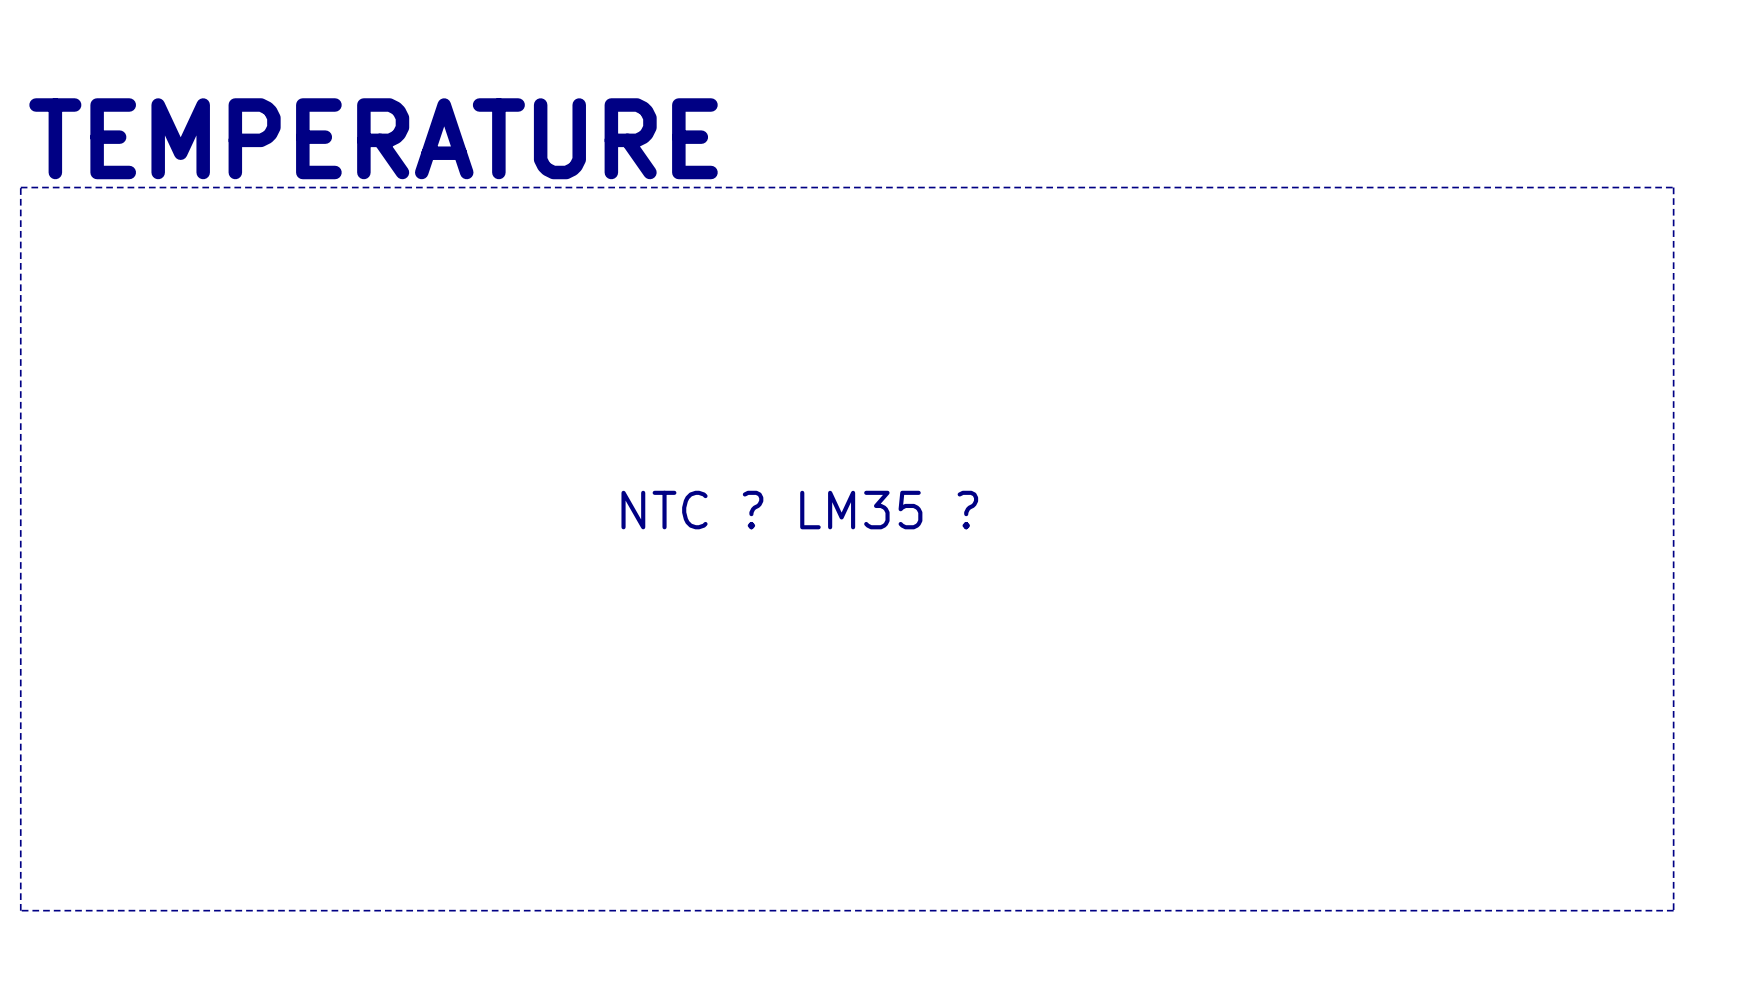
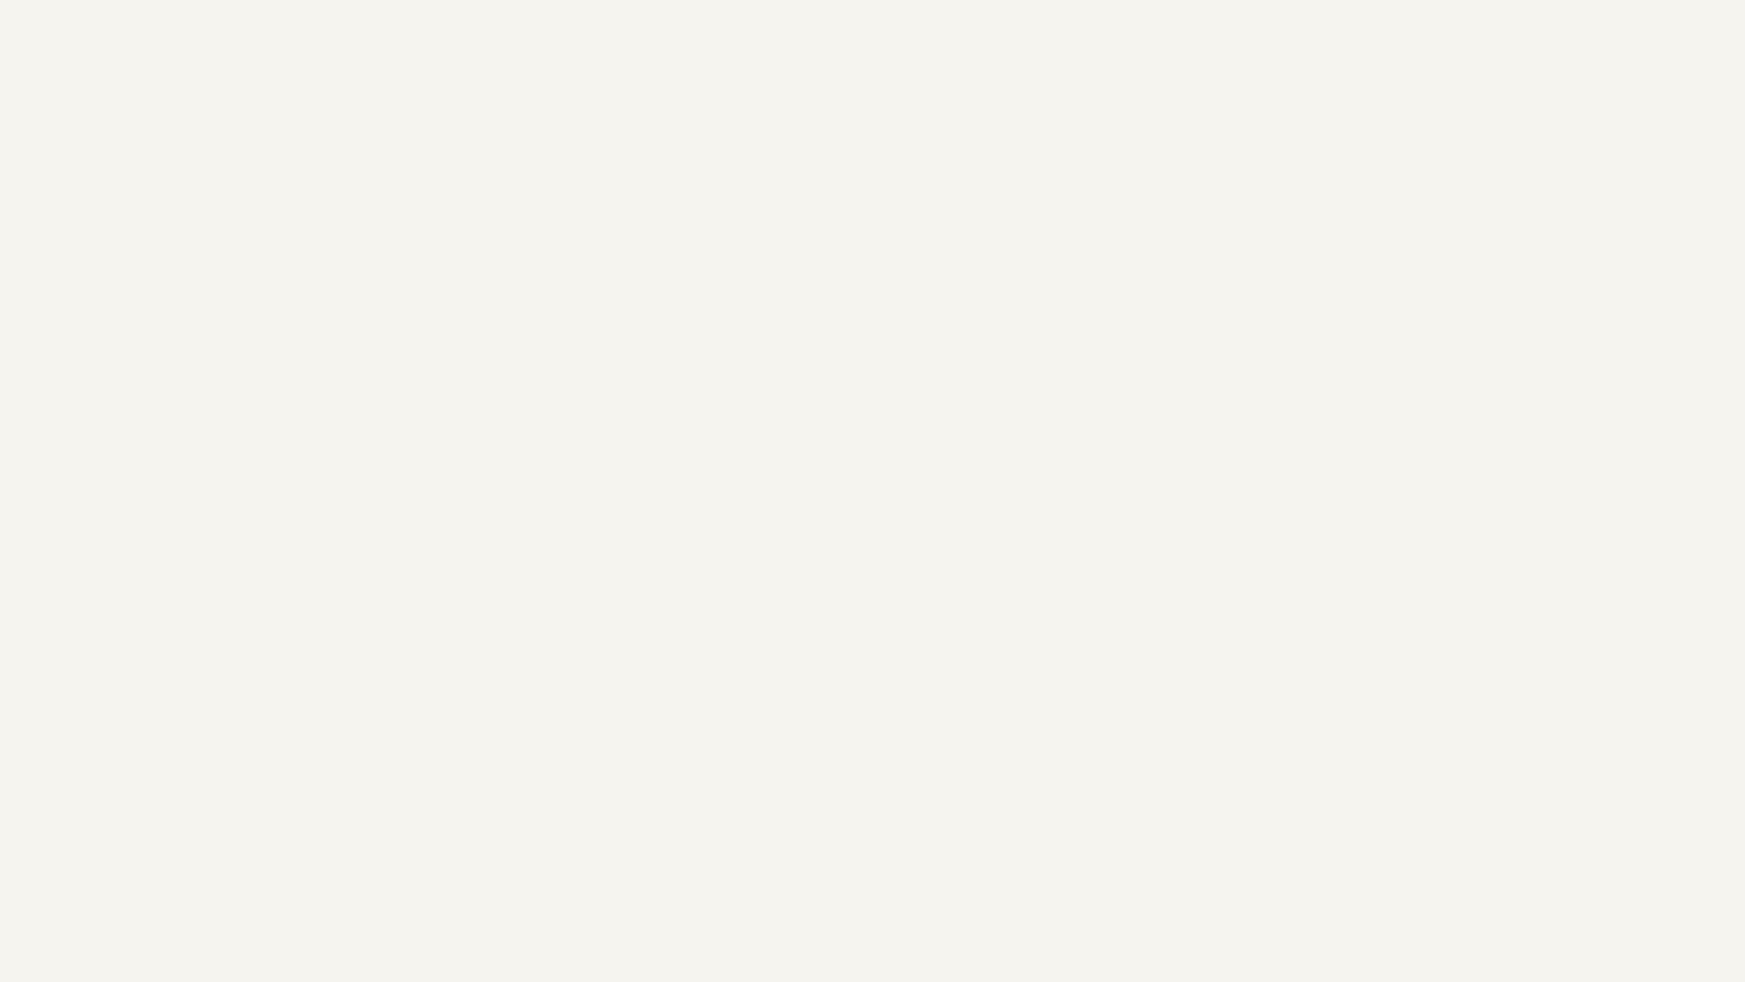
text: TEMPERATURE (373, 138) -> none
line: (20, 187) (1673, 187) (1673, 910) (20, 910) (20, 187) -> none
text: NTC ? LM35 ? (799, 510) -> none

